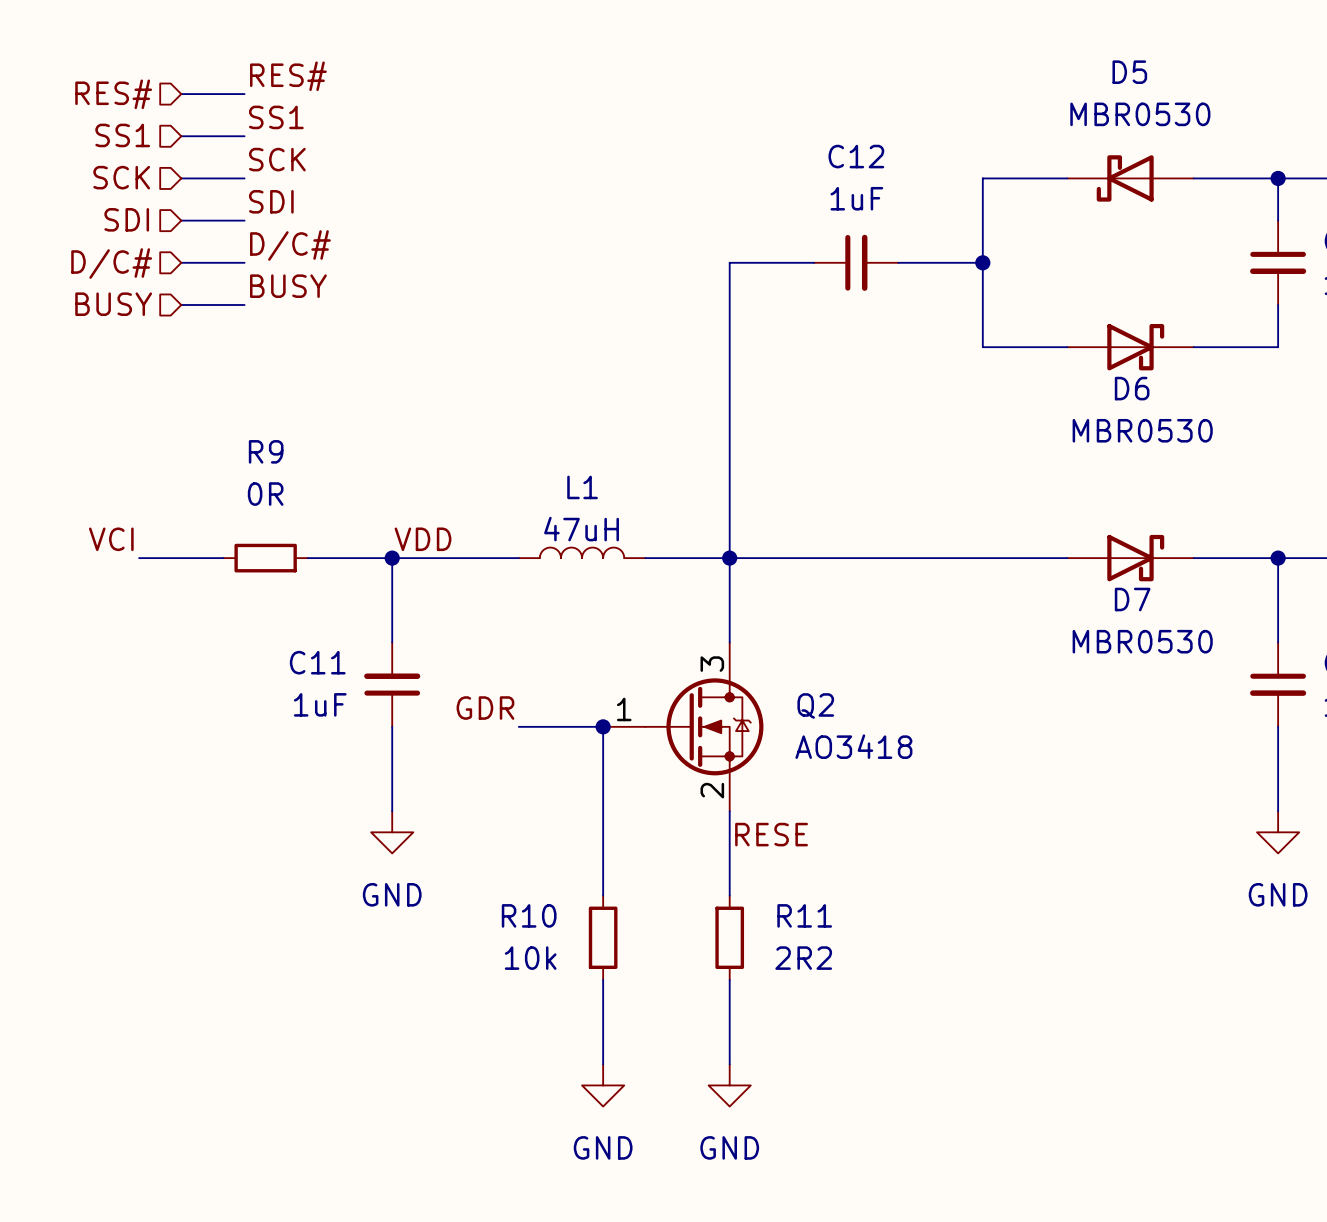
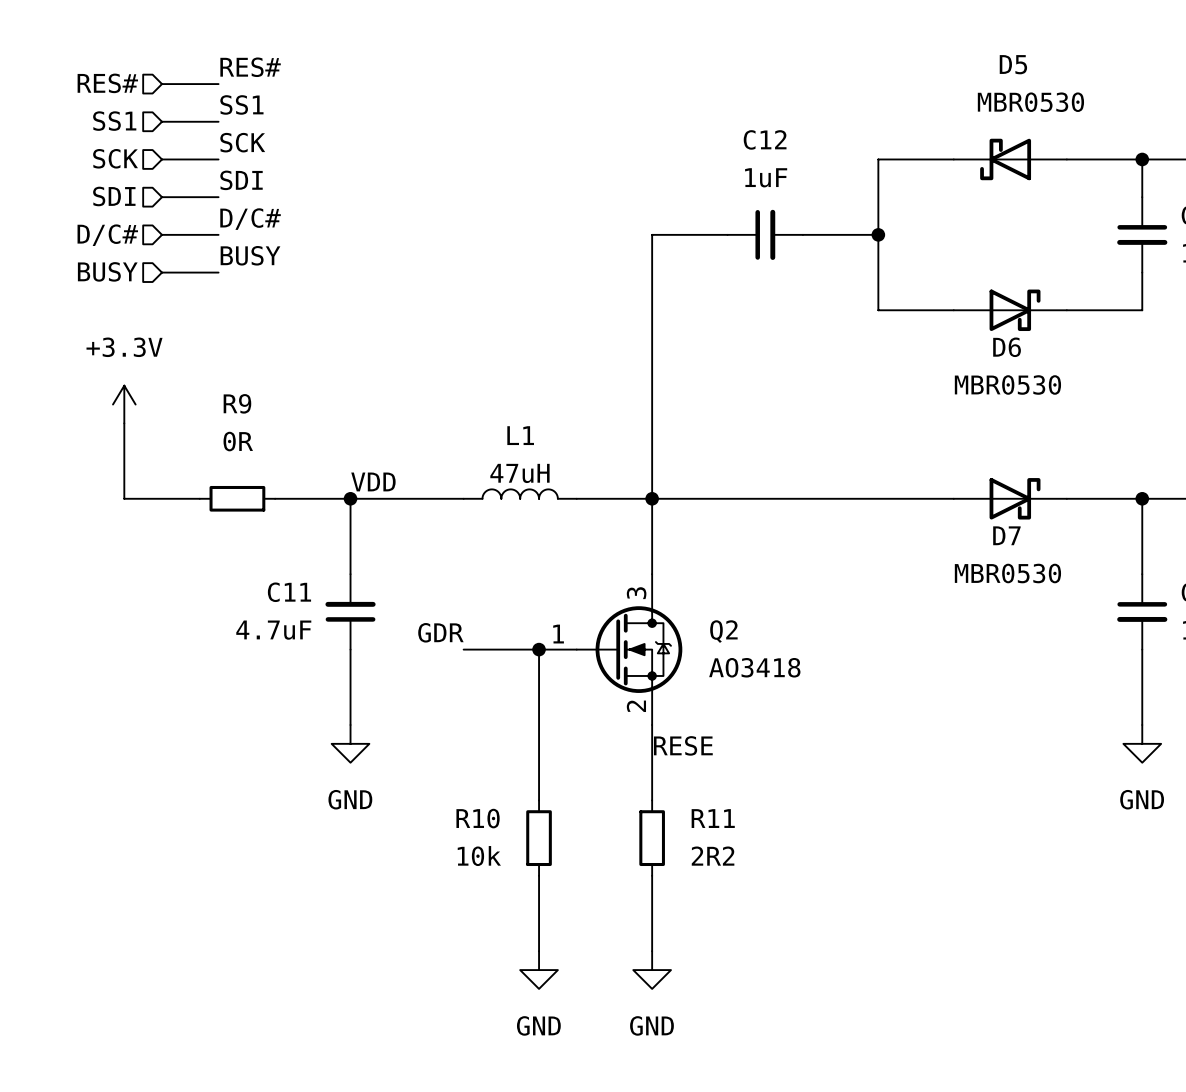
power symbol: none -> +3.3V (124, 404)
wire: none -> (124, 423) (124, 498)
label: VCI (111, 539) -> none
C11 value: 1uF (320, 704) -> 4.7uF (273, 630)

